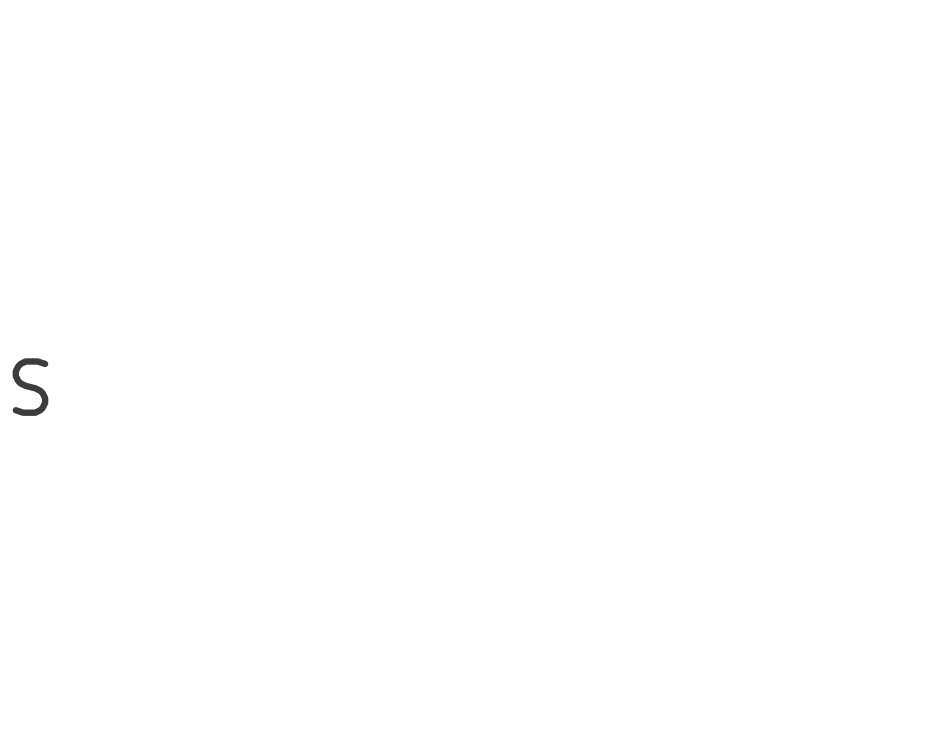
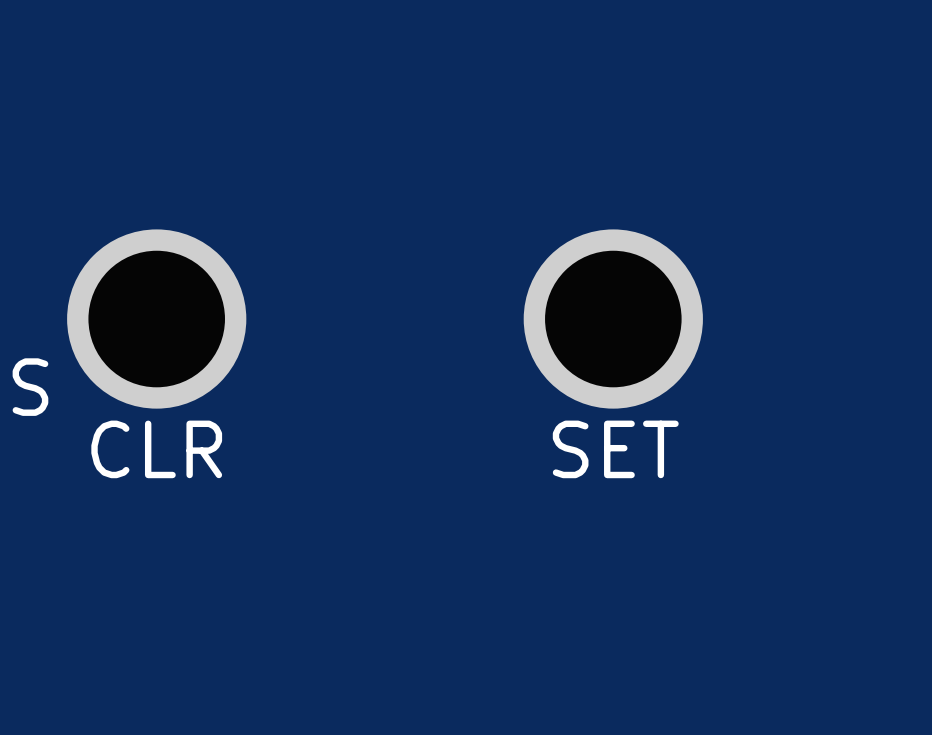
part: none -> (156, 319)
part: none -> (613, 319)

